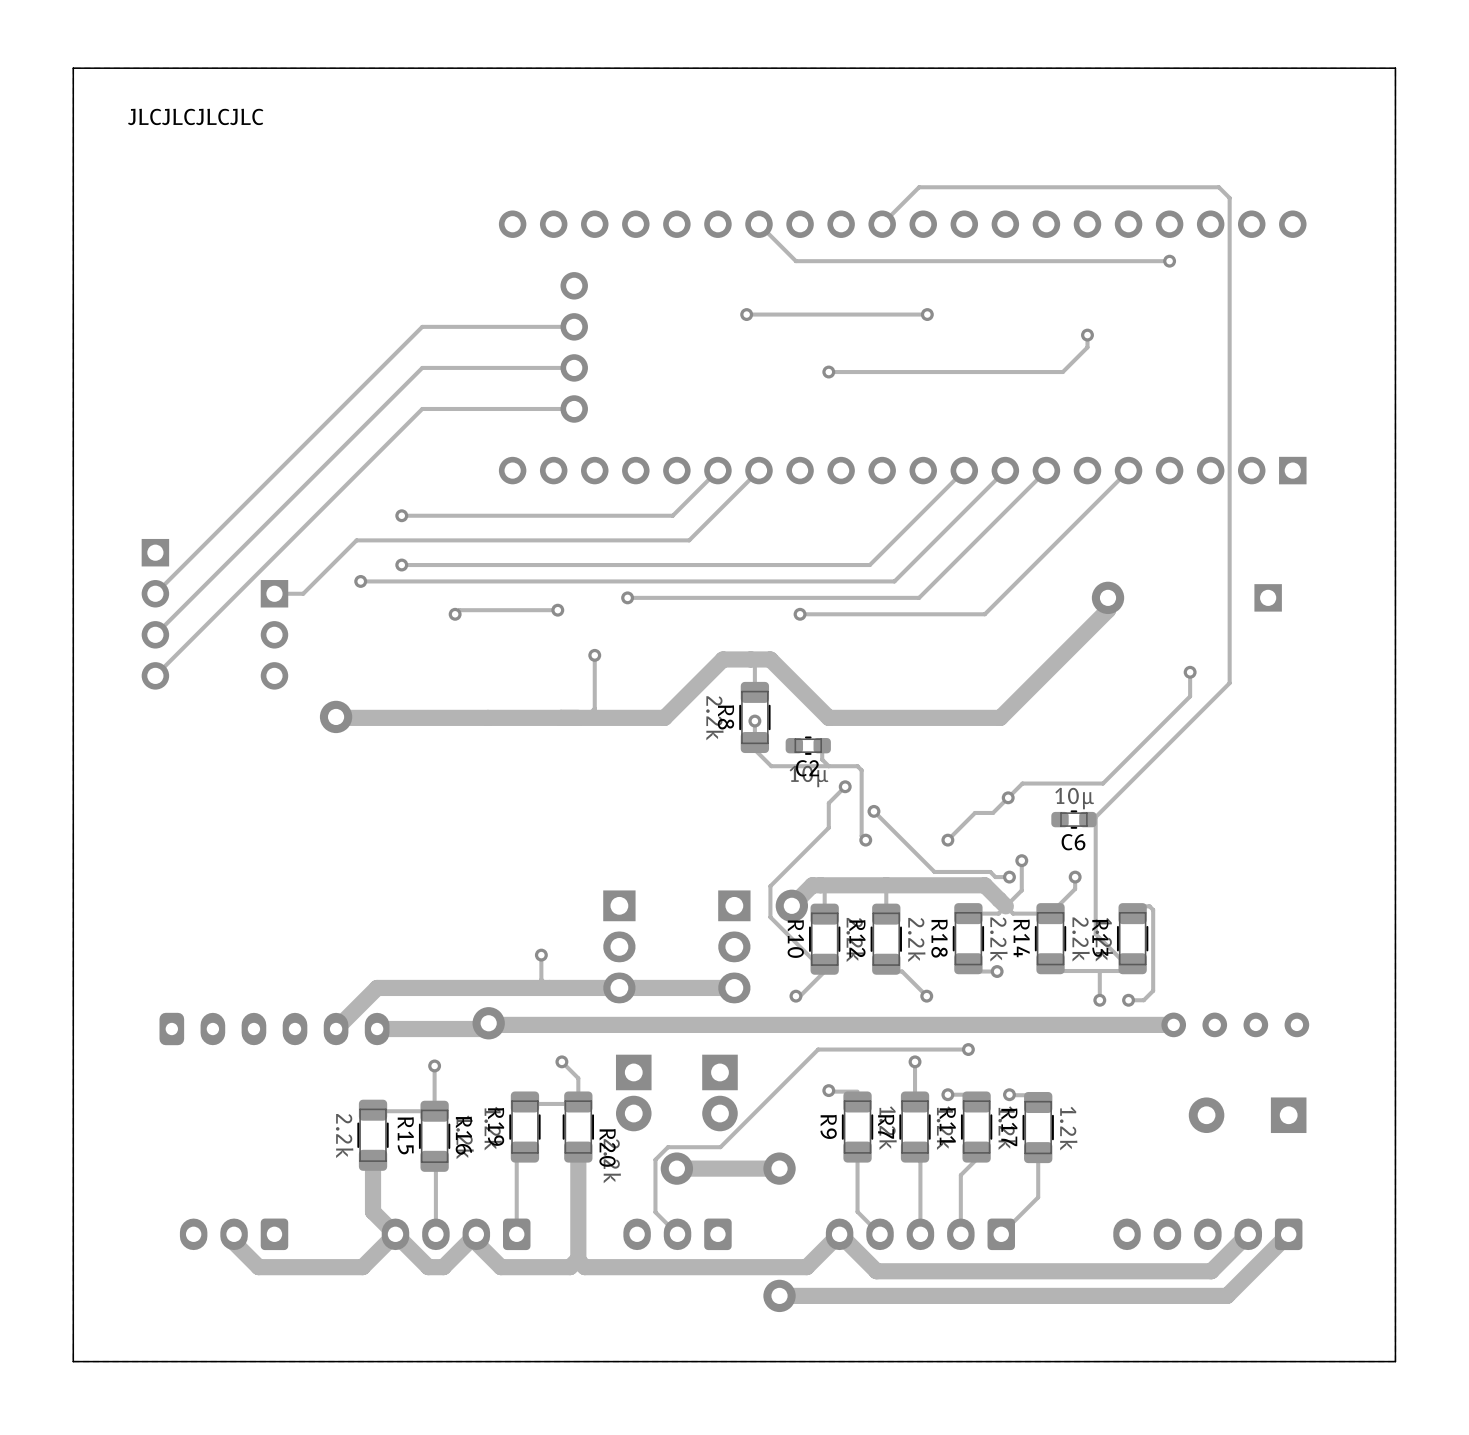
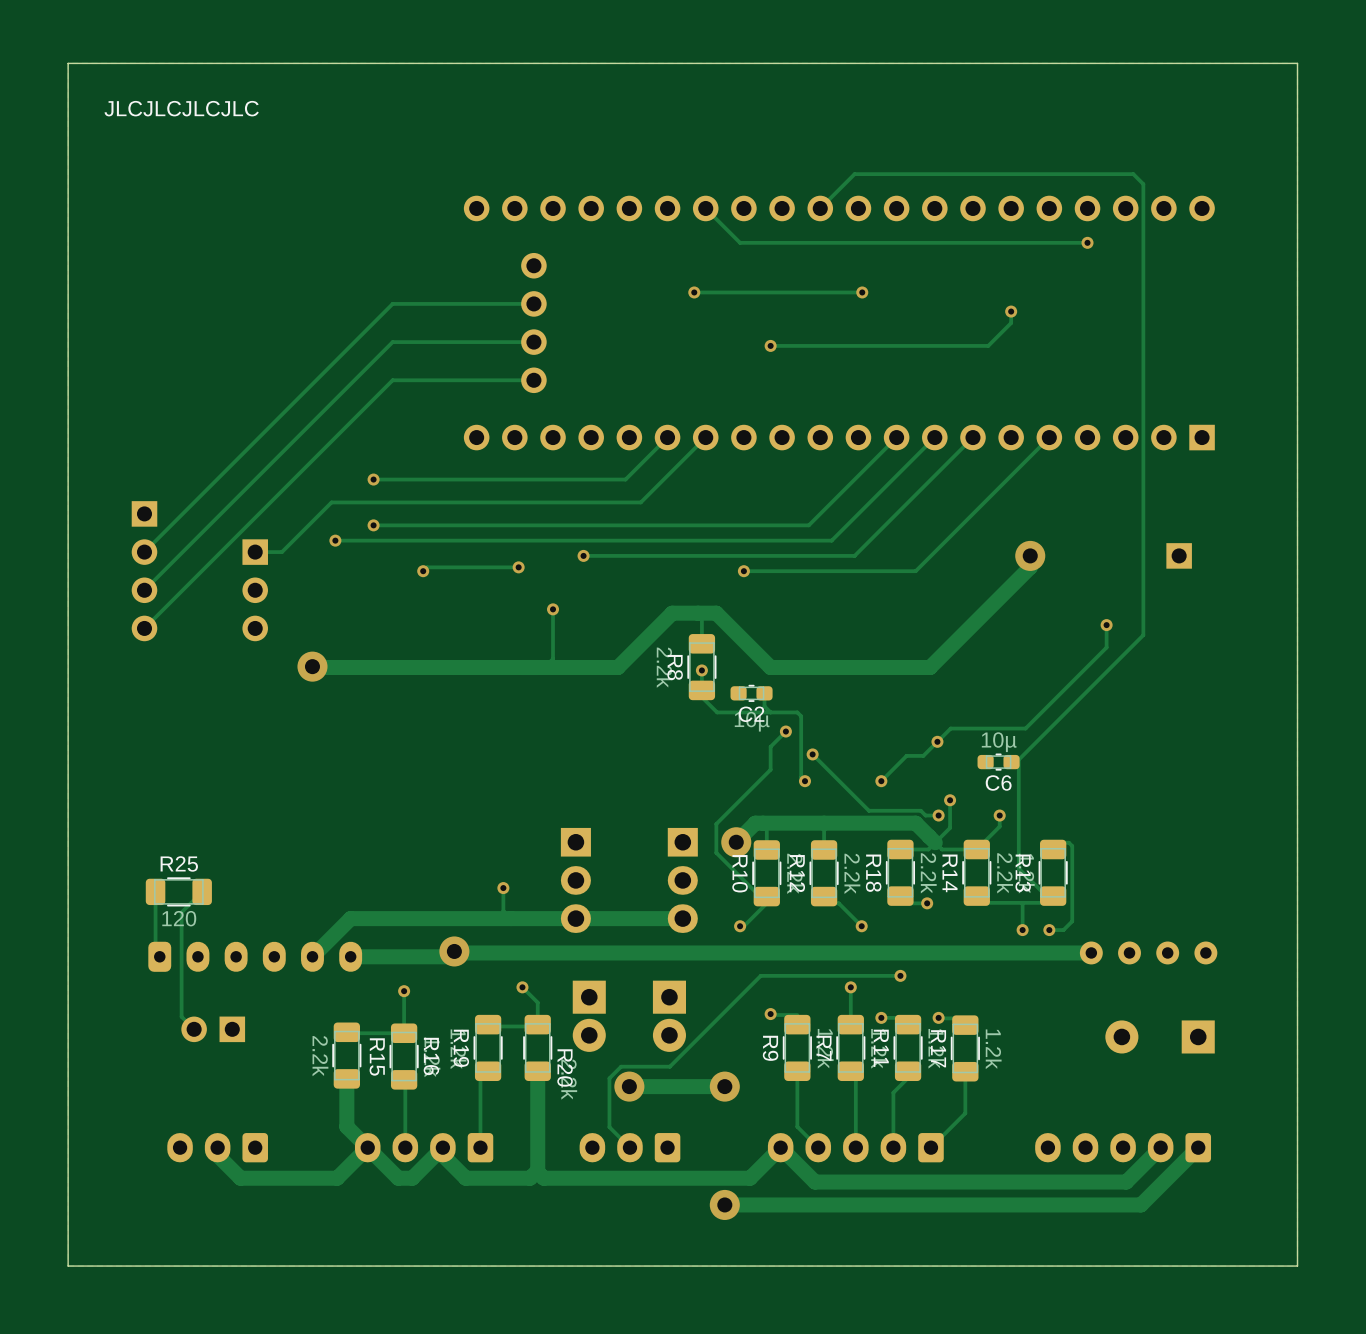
track: none -> (155, 891) (155, 952) (159, 956)
R25: none -> 120 (178, 891)
track: none -> (202, 891) (181, 912) (181, 1016) (194, 1029)
part: none -> (213, 1029)

